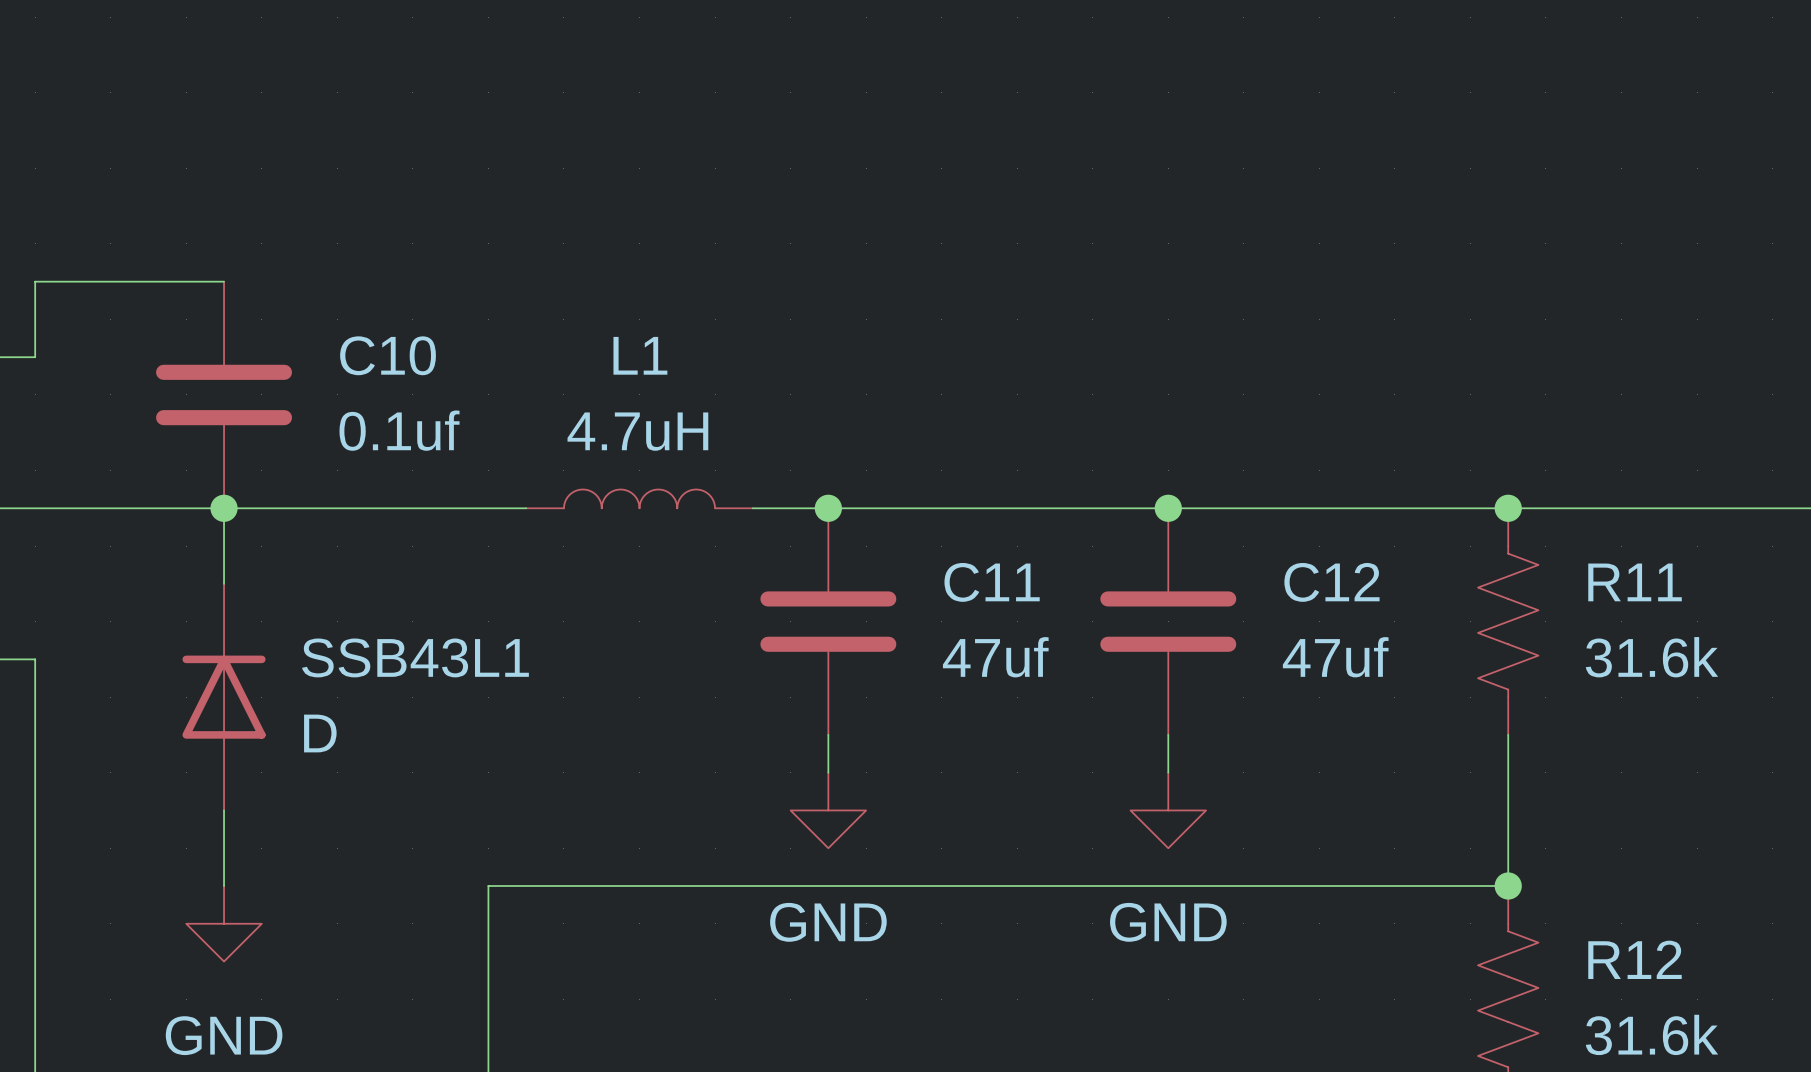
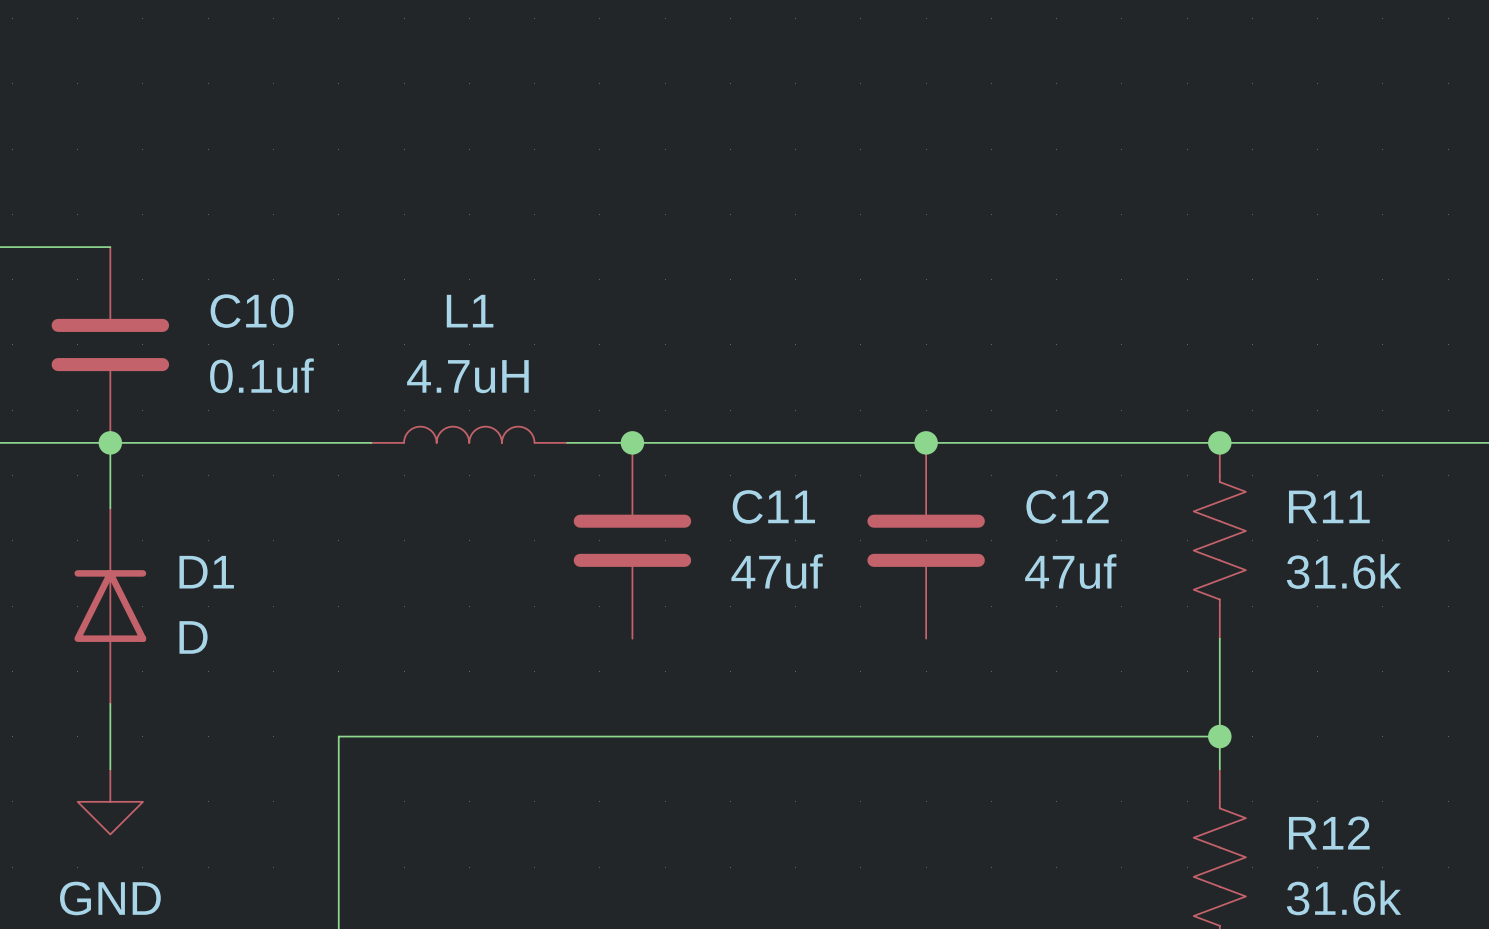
SSB43L1 name: SSB43L1 (415, 657) -> D1 (206, 572)
wire: (828, 734) (828, 772) -> none
wire: (1168, 734) (1168, 772) -> none
power symbol: GND (828, 810) -> none
power symbol: GND (1168, 810) -> none
wire: (488, 886) (1508, 886) -> (338, 769) (338, 736) (1219, 736)
junction position: (1508, 886) -> (1219, 736)

